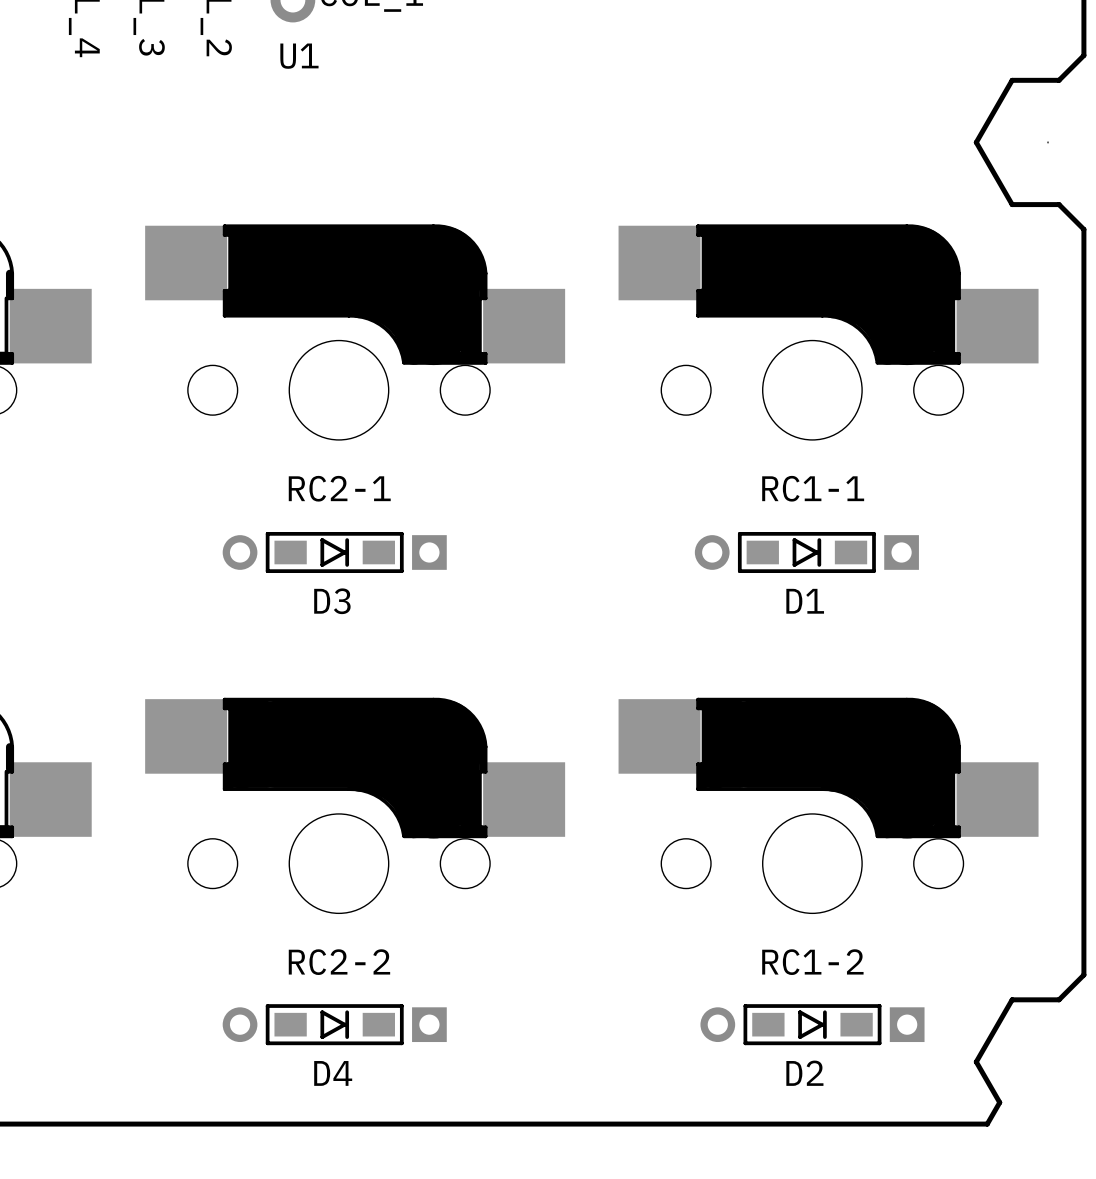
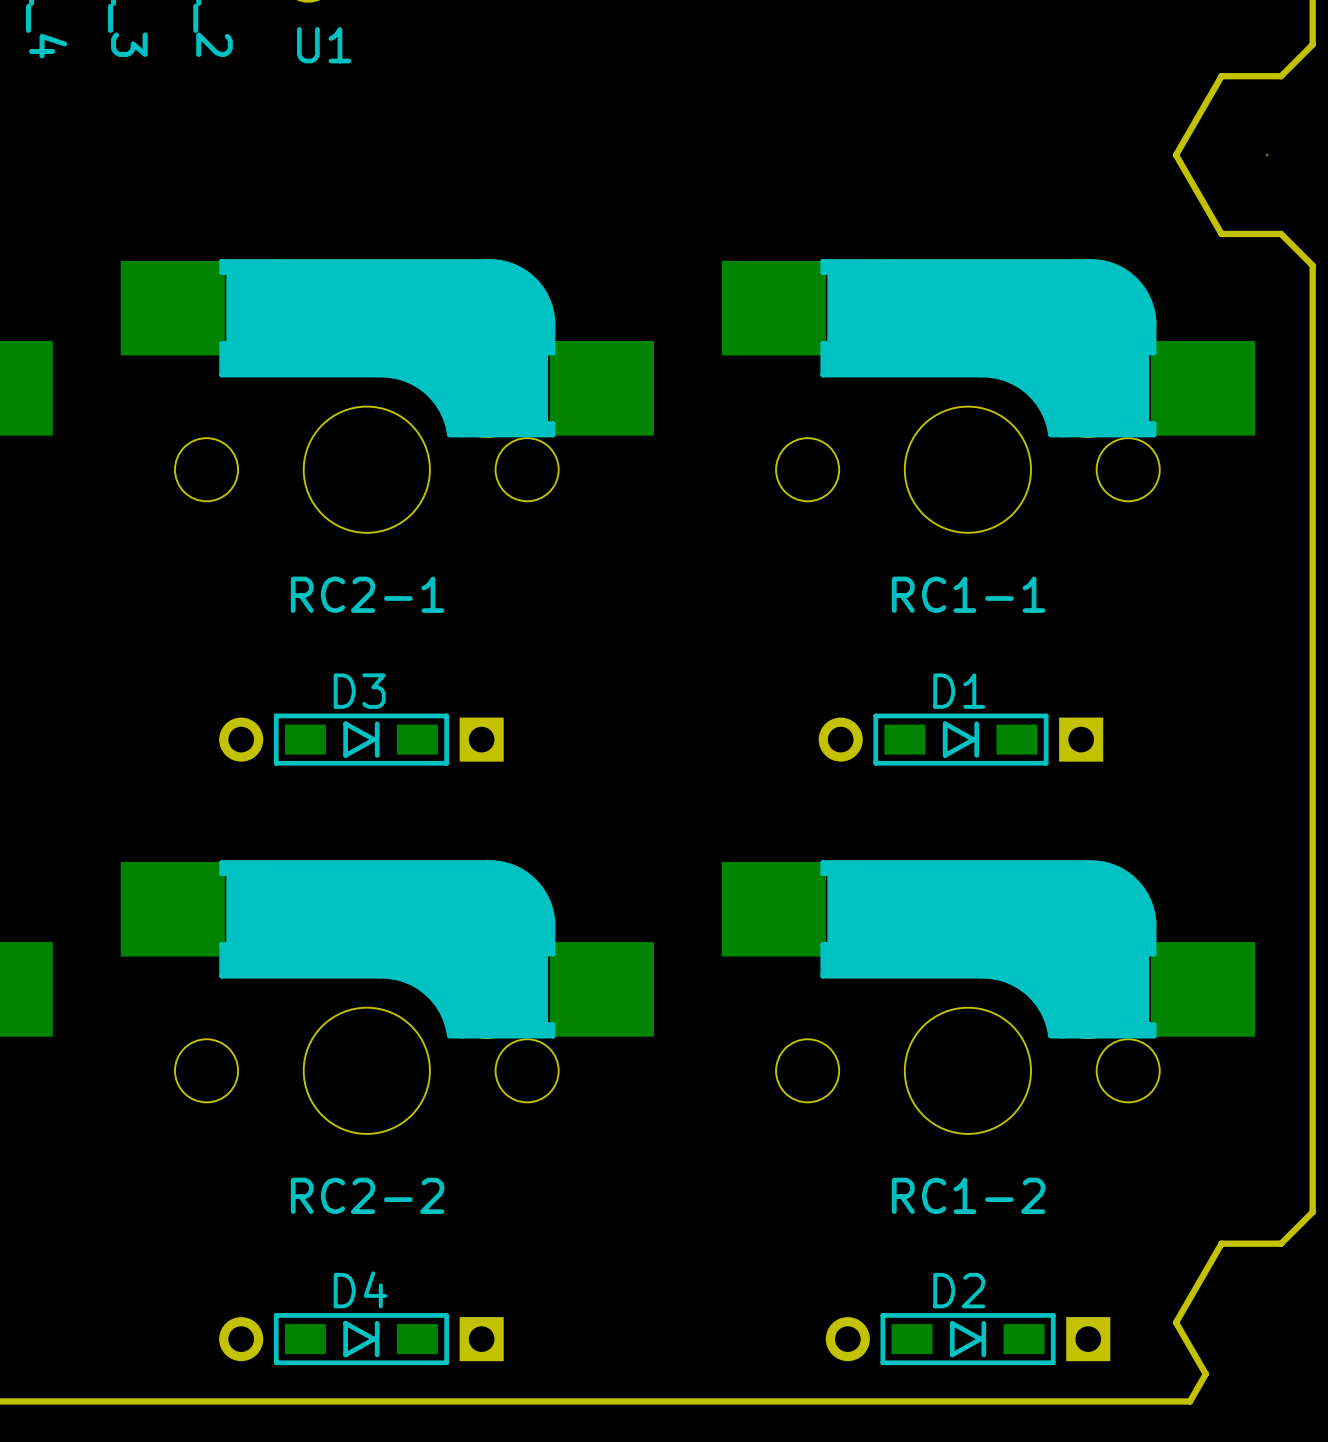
D3 position: (334, 552) -> (361, 739)
D1 position: (806, 552) -> (960, 739)
D3 name position: D3 (332, 601) -> D3 (359, 691)
D1 name position: D1 (805, 601) -> D1 (959, 691)
D4 position: (334, 1024) -> (361, 1339)
D2 position: (812, 1024) -> (968, 1339)
D4 name position: D4 (333, 1073) -> D4 (360, 1289)
D2 name position: D2 (804, 1073) -> D2 (959, 1290)

